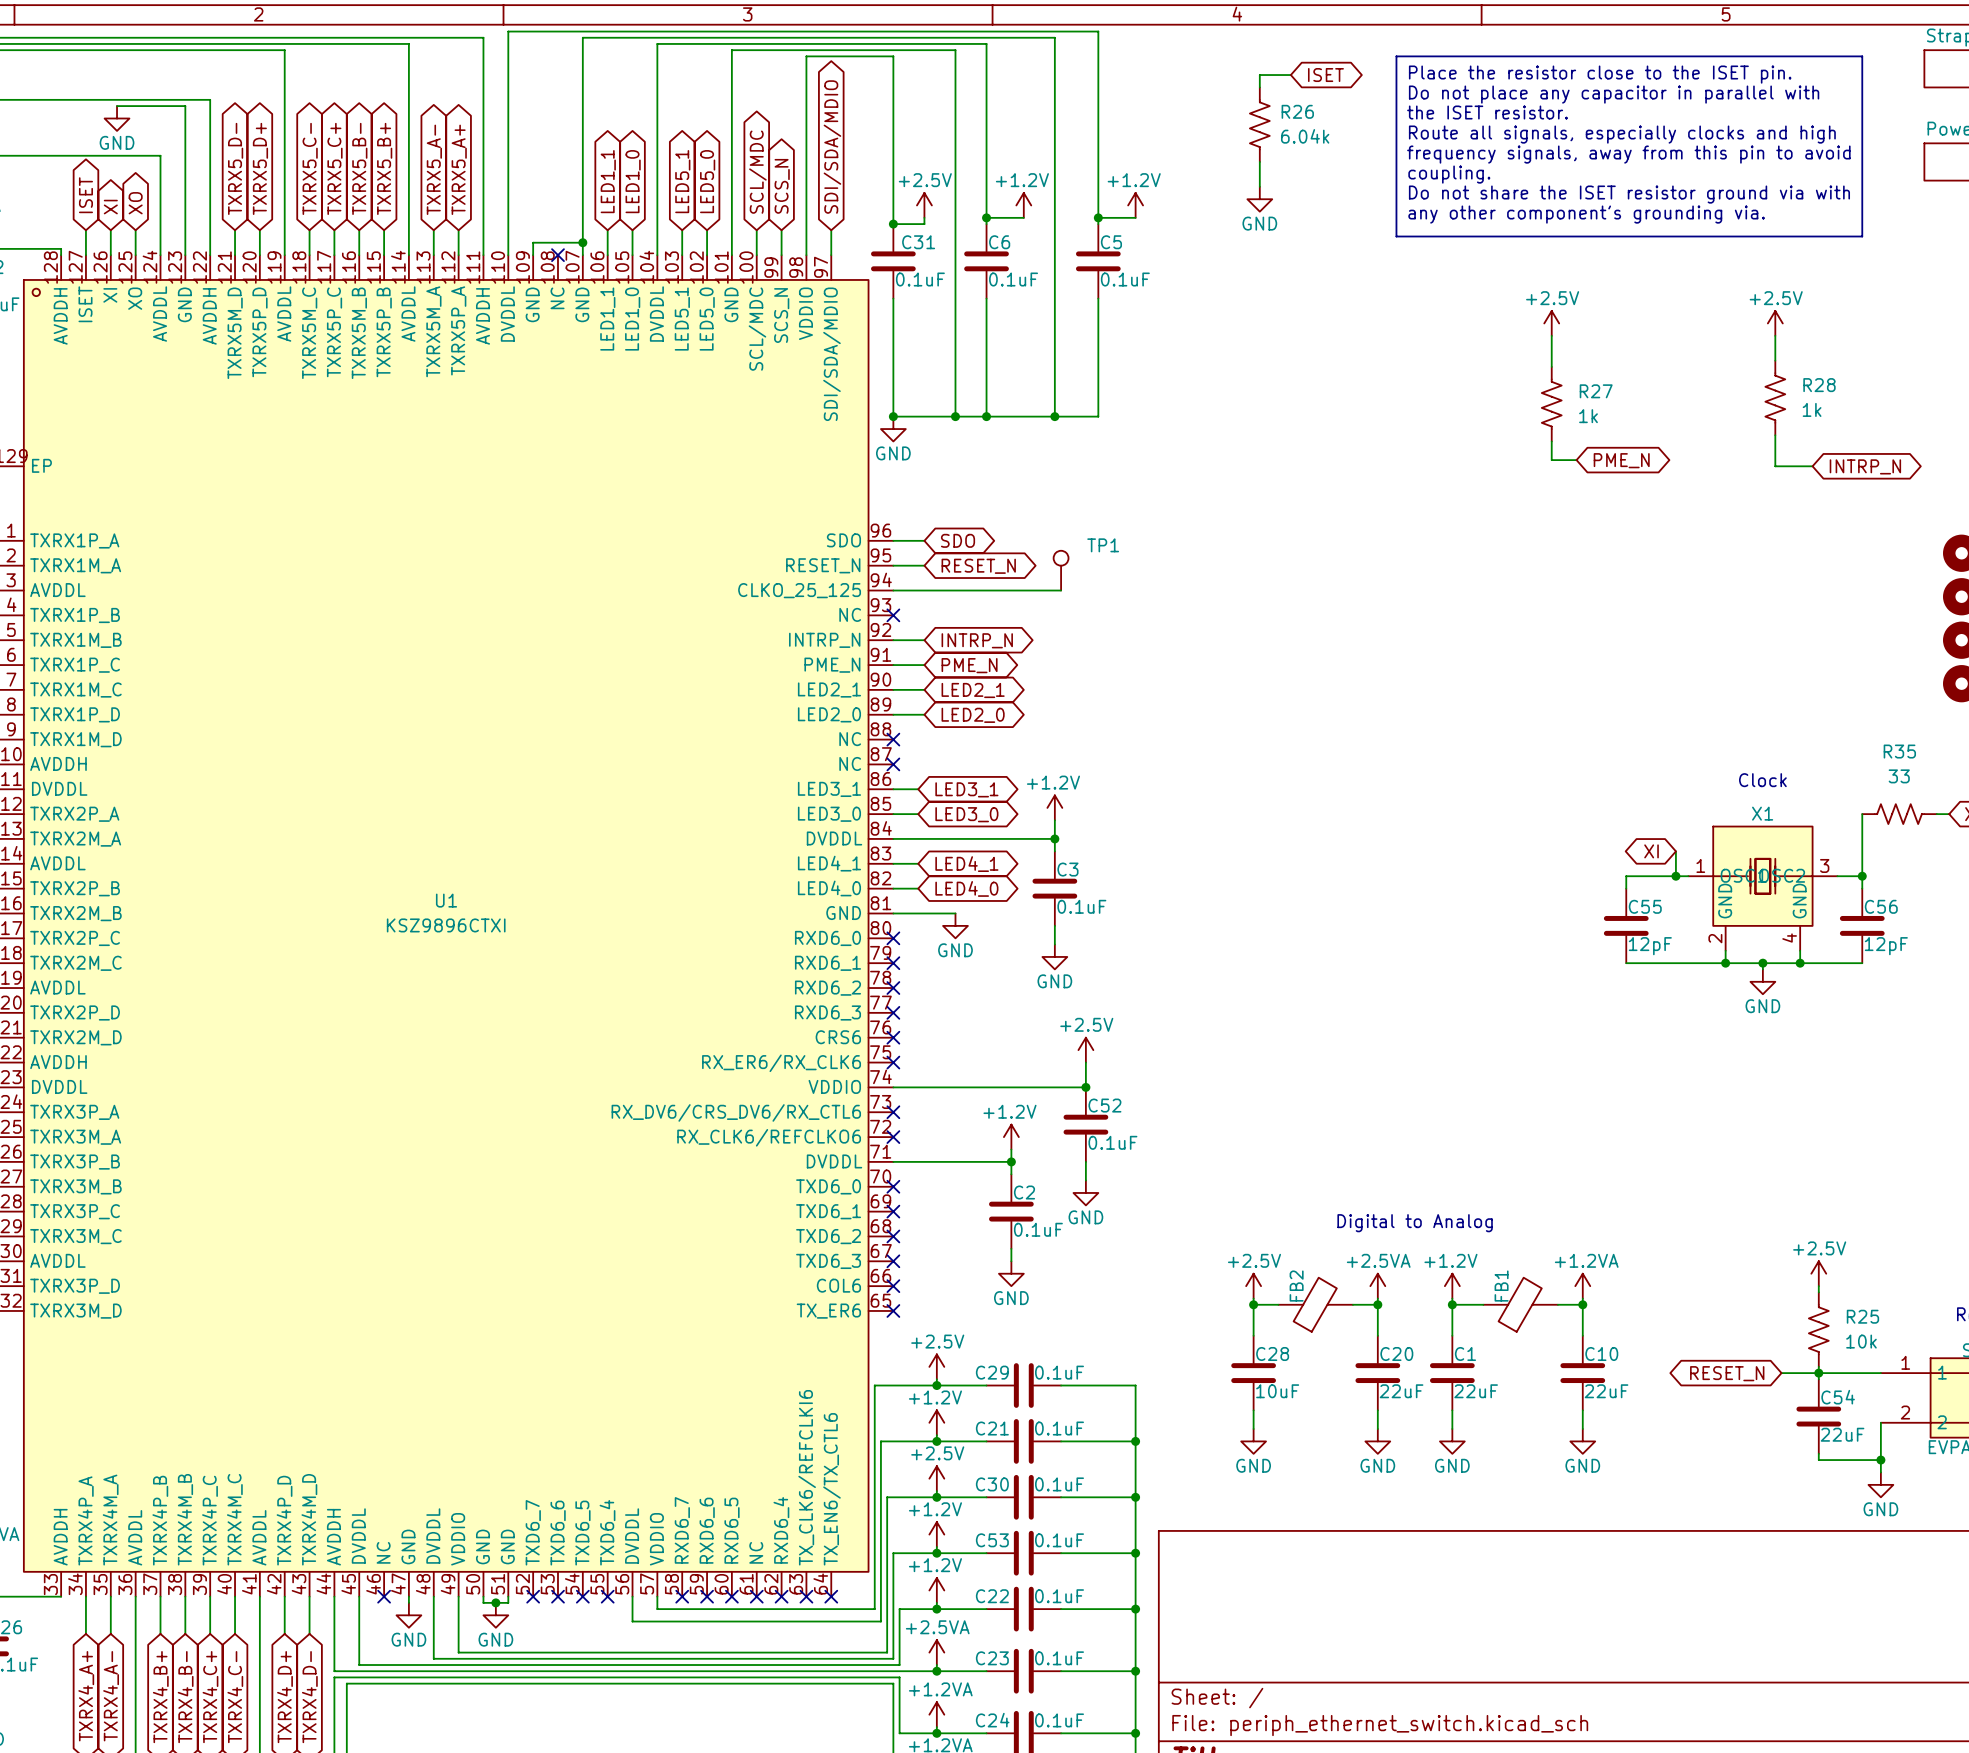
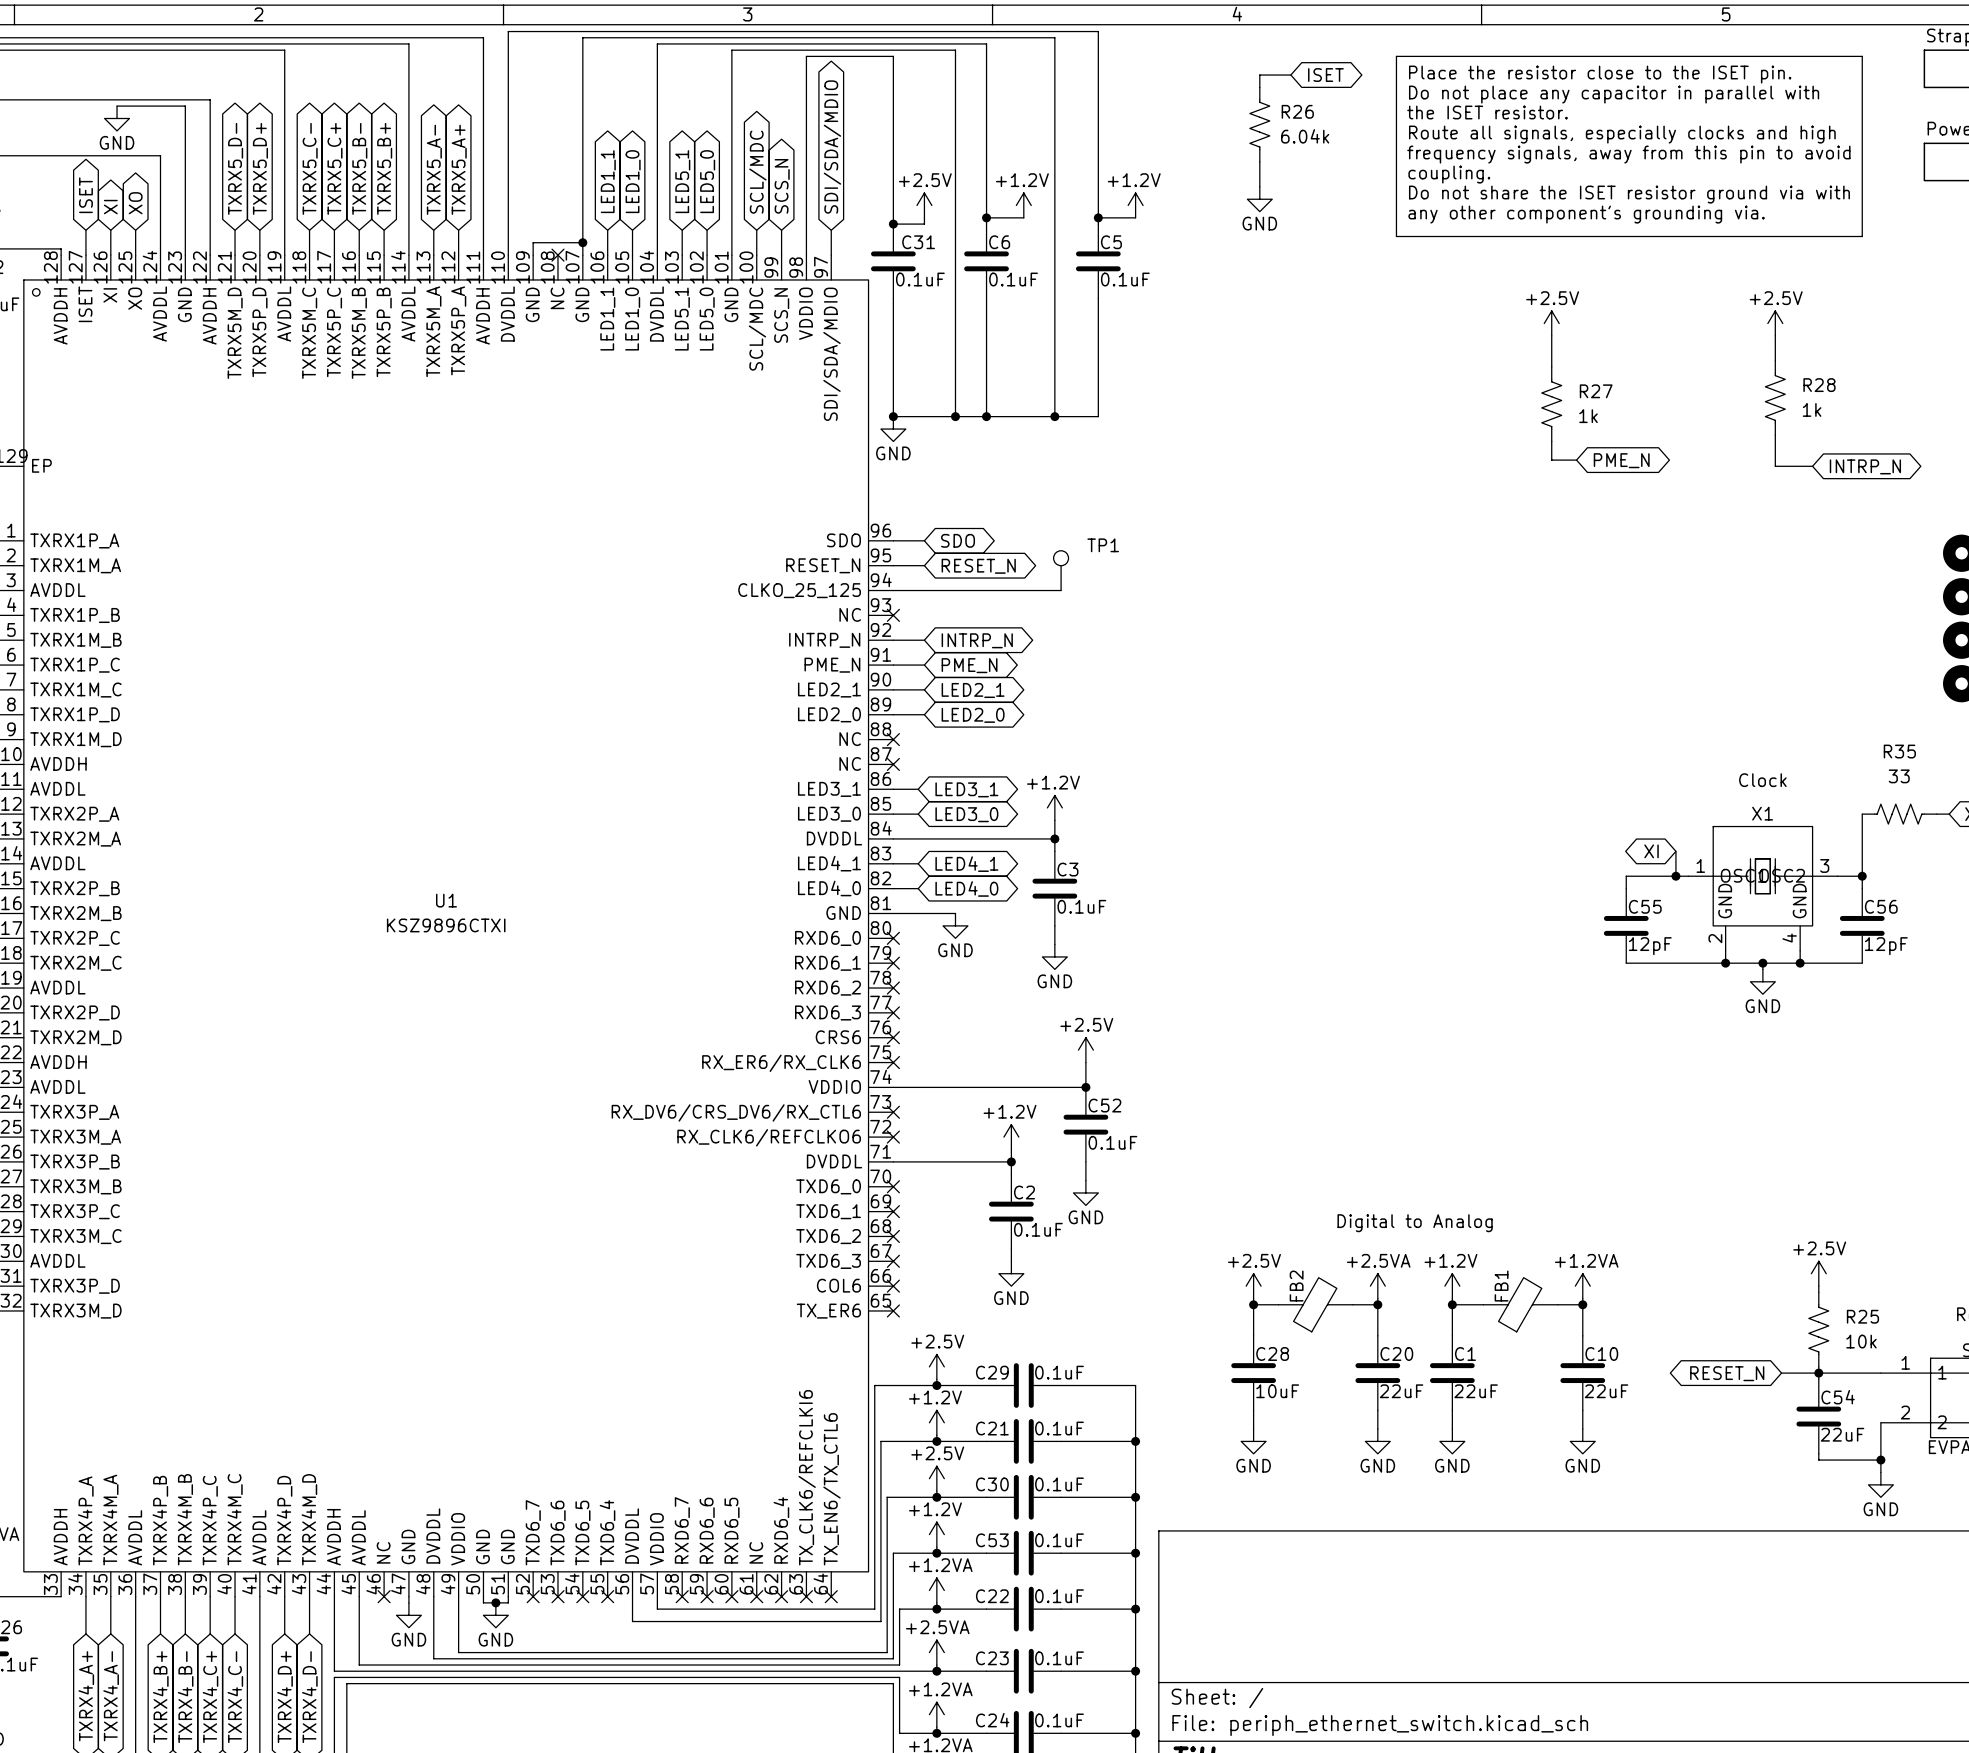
U1 pin name: DVDDL (59, 788) -> AVDDL (57, 788)
U1 pin name: DVDDL (59, 1086) -> AVDDL (57, 1086)
U1 pin name: DVDDL (358, 1536) -> AVDDL (358, 1537)
power symbol: +1.2V (936, 1590) -> +1.2VA (936, 1590)

